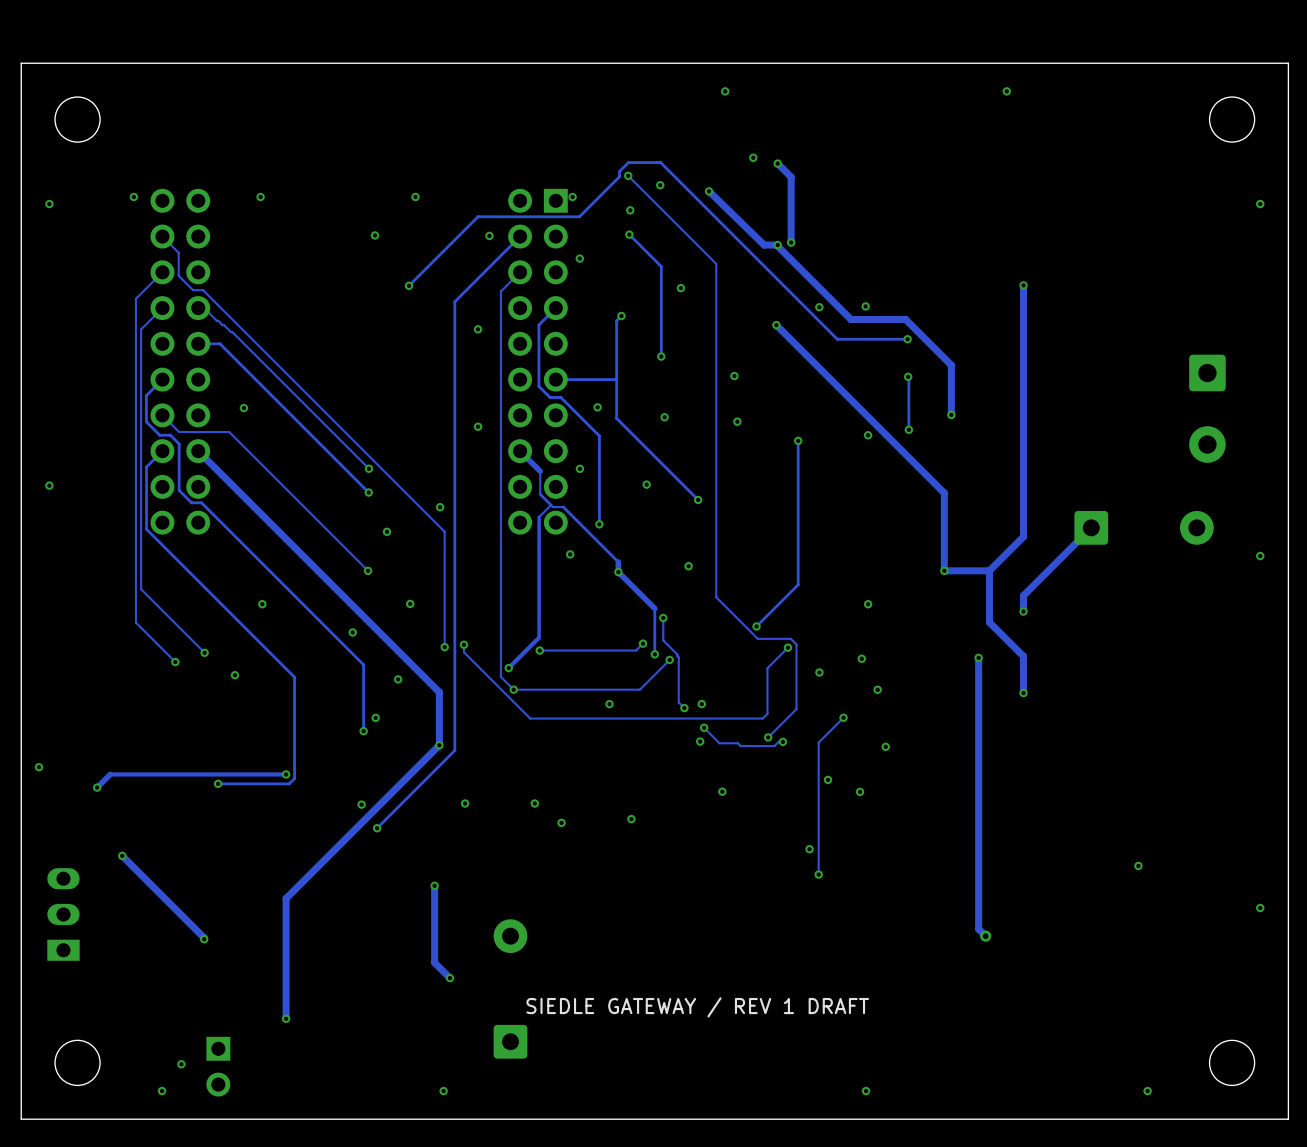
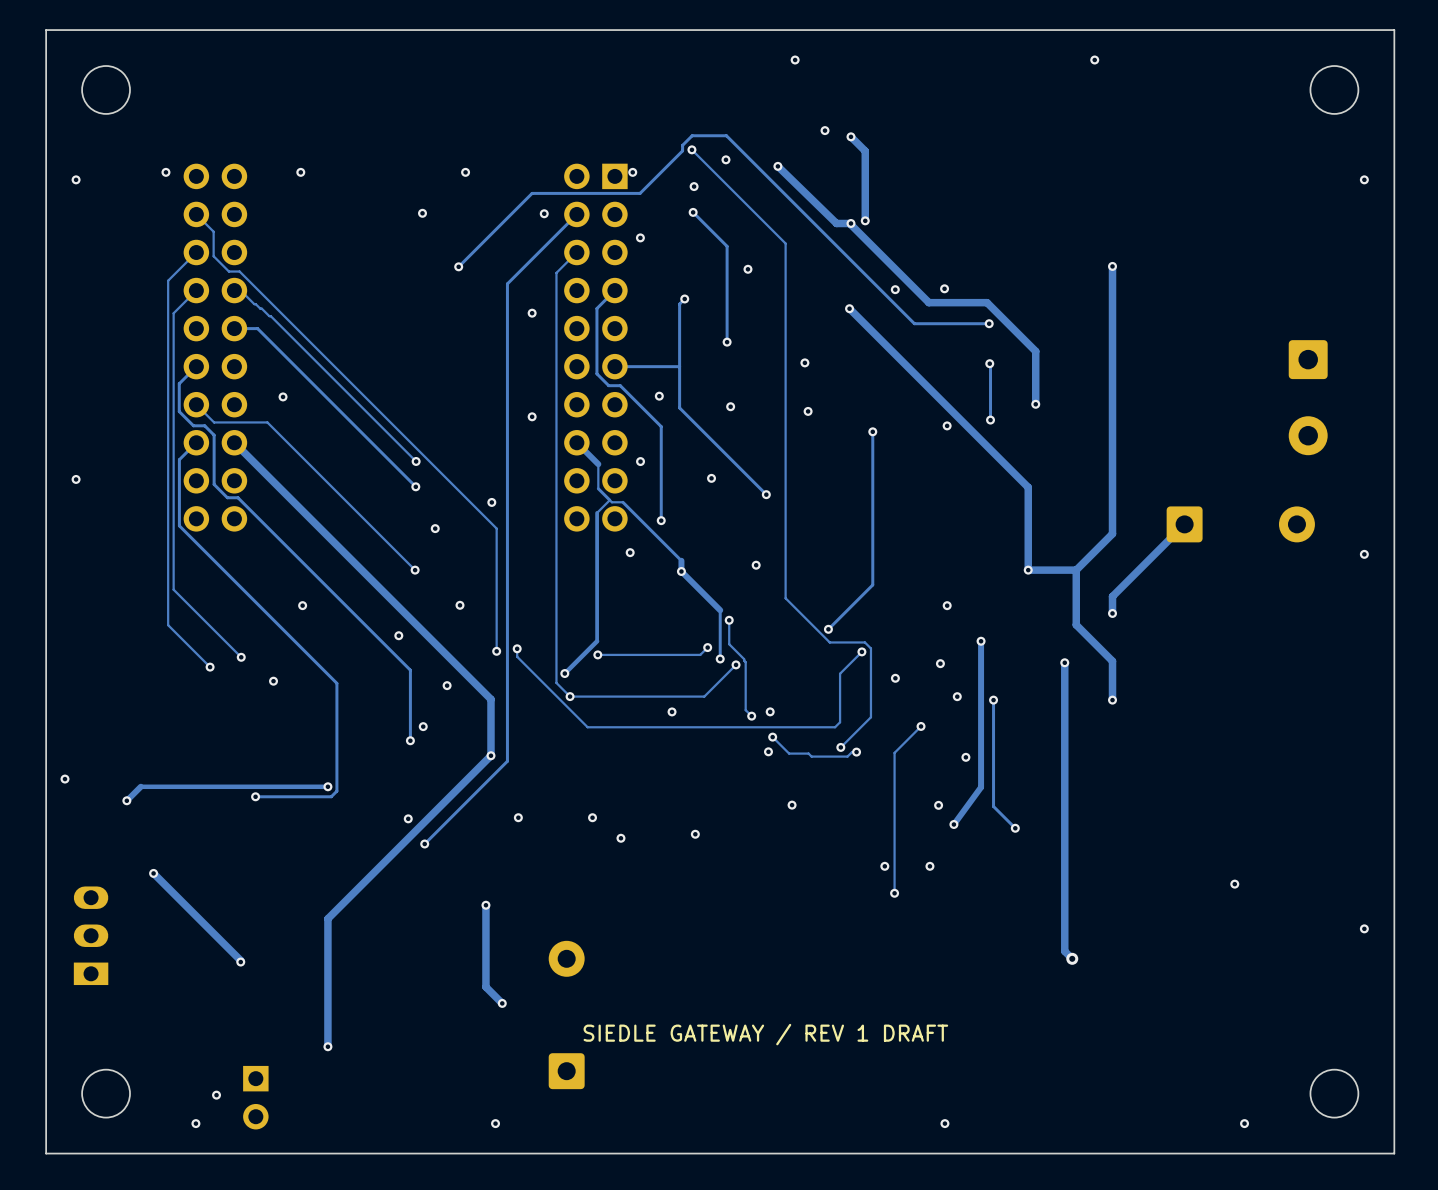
track: none -> (981, 641) (981, 787) (953, 824)
via: none -> (981, 641)
track: none -> (993, 700) (993, 806) (1015, 828)
via: none -> (993, 700)
via: (828, 779) -> none
via: none -> (953, 824)
via: none -> (1015, 828)
via: none -> (929, 866)

